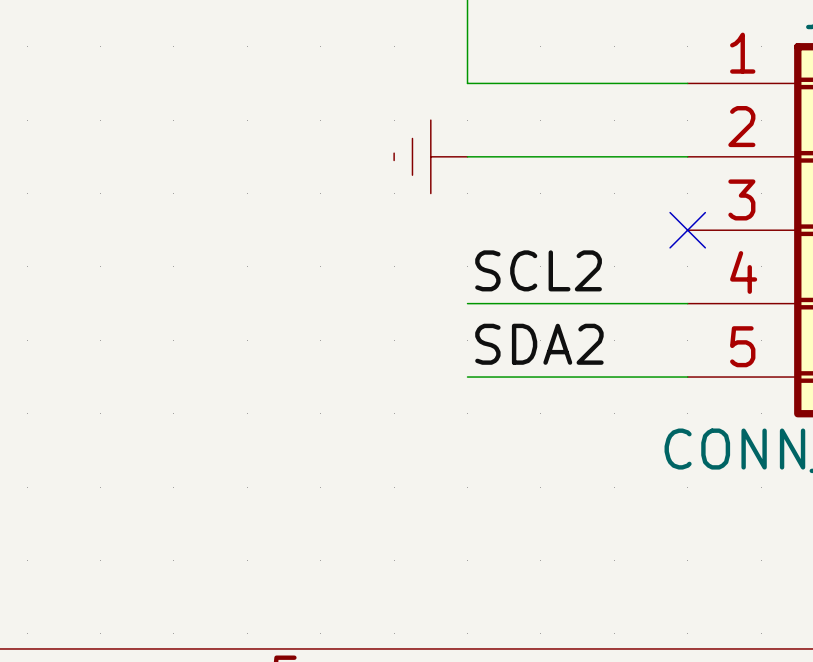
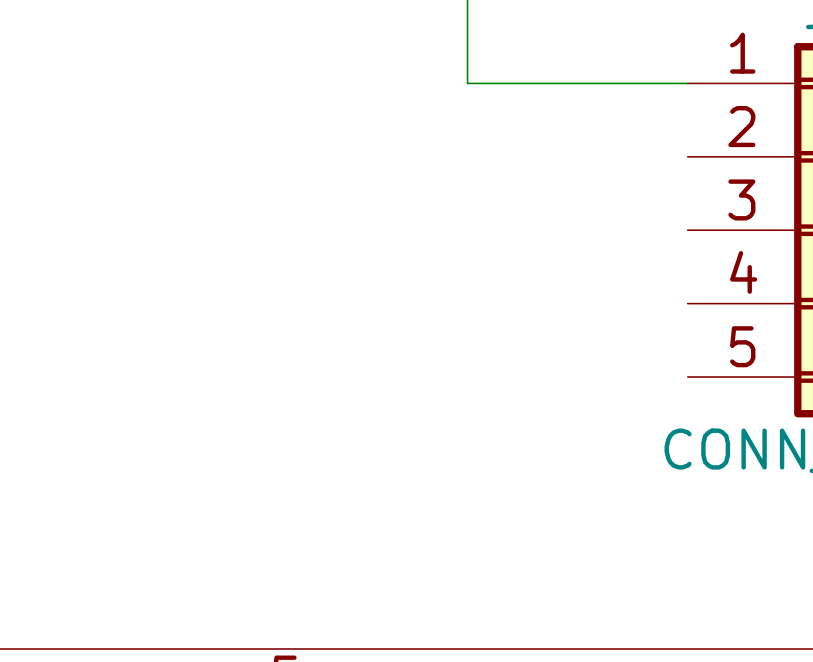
power symbol: (430, 156) -> none
wire: (467, 156) (687, 156) -> none
no-connect mark: (687, 230) -> none
label: SCL2 (538, 270) -> none
wire: (467, 303) (687, 303) -> none
label: SDA2 (539, 344) -> none
wire: (467, 377) (687, 377) -> none

